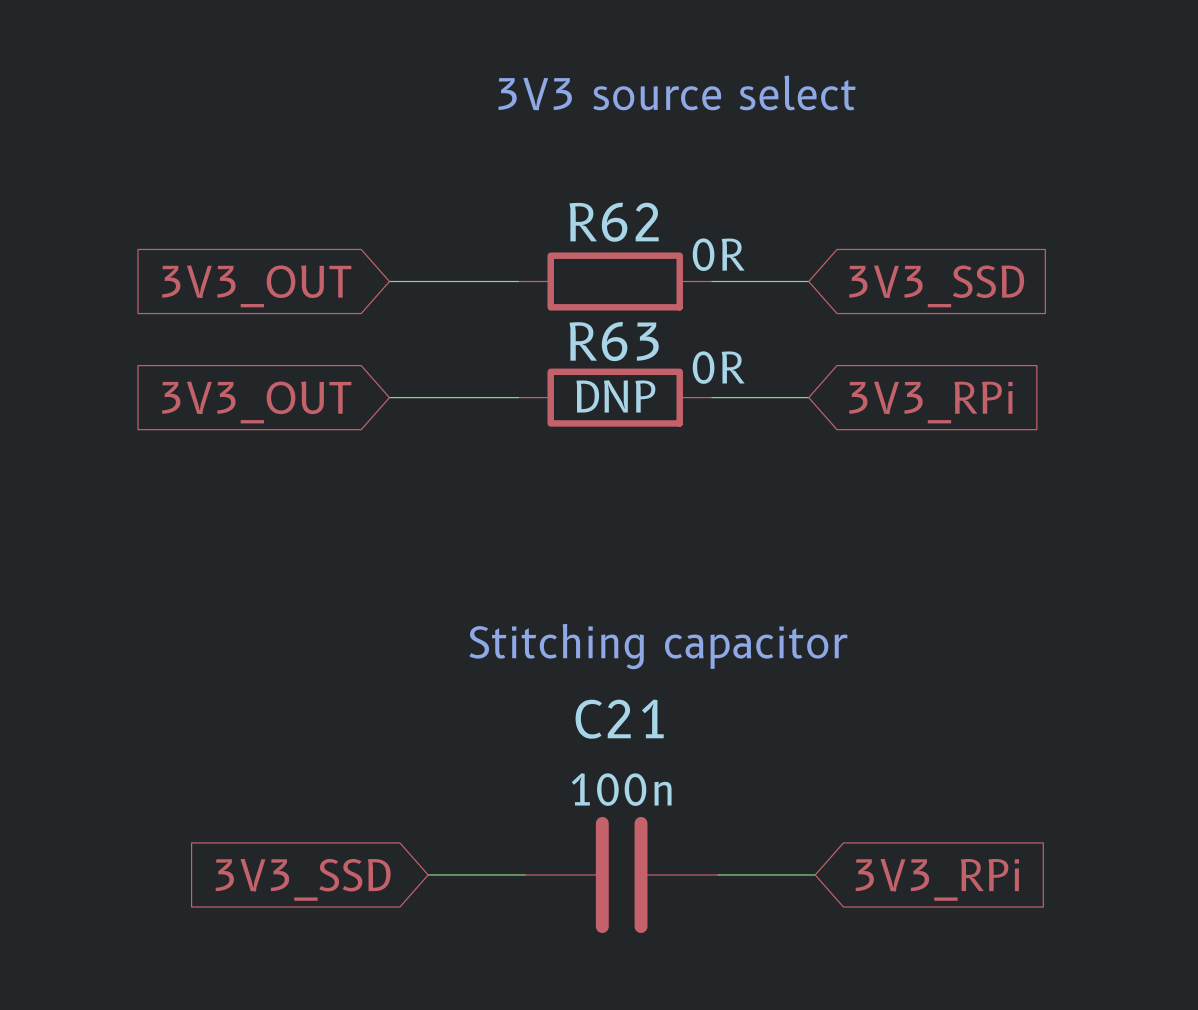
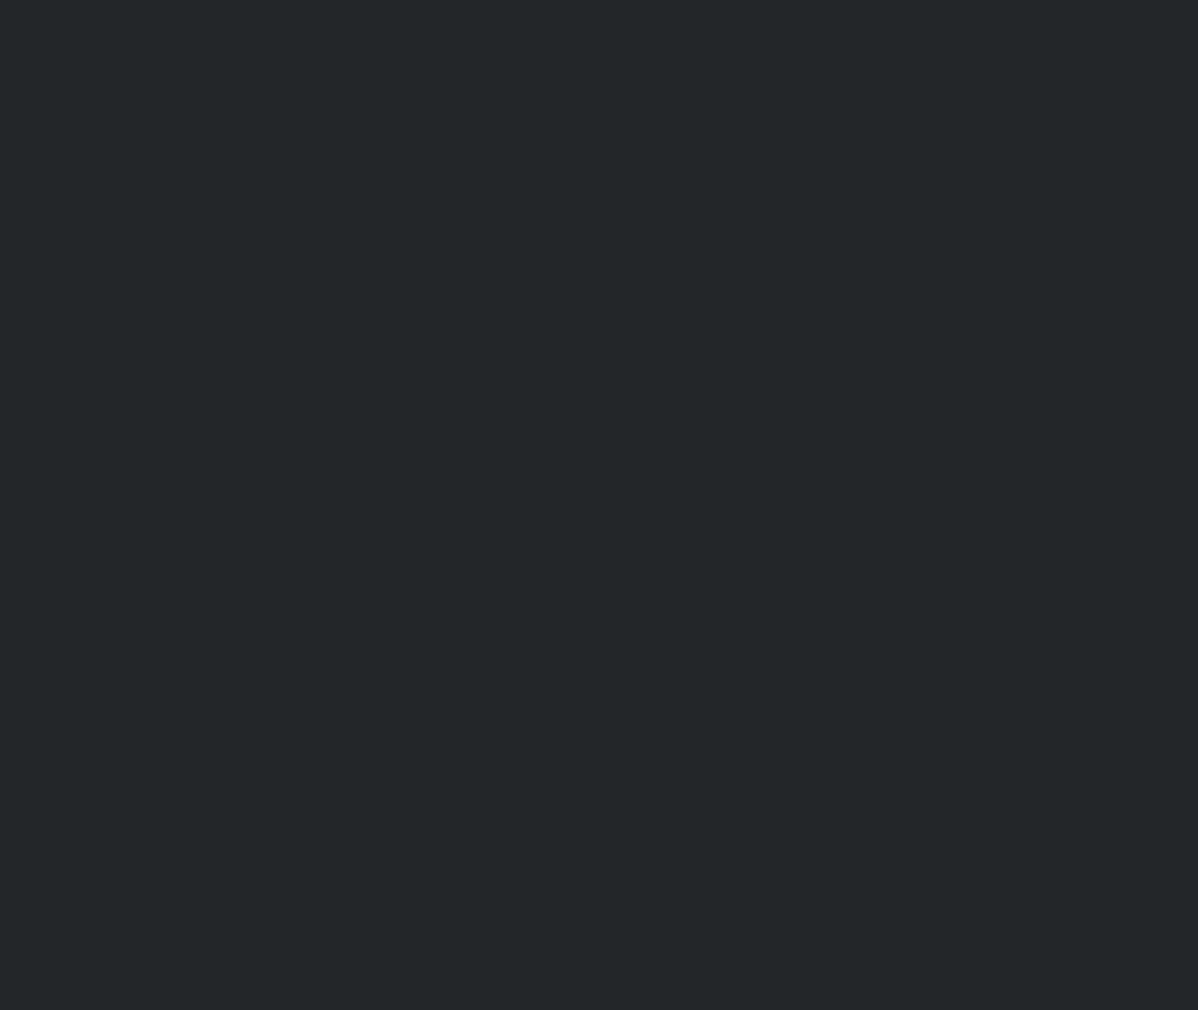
text: 3V3 source select (677, 92) -> none
wire: (389, 281) (518, 281) -> none
R62: (615, 281) -> none
wire: (711, 281) (808, 281) -> none
global label: 3V3_OUT (256, 286) -> none
global label: 3V3_SSD (936, 286) -> none
wire: (389, 397) (518, 397) -> none
R63: (615, 397) -> none
wire: (711, 397) (808, 397) -> none
global label: 3V3_OUT (256, 402) -> none
global label: 3V3_RPi (930, 402) -> none
text: Stitching capacitor (658, 646) -> none
wire: (428, 874) (524, 874) -> none
C21: (621, 874) -> none
wire: (718, 874) (815, 874) -> none
global label: 3V3_SSD (303, 879) -> none
global label: 3V3_RPi (937, 879) -> none

